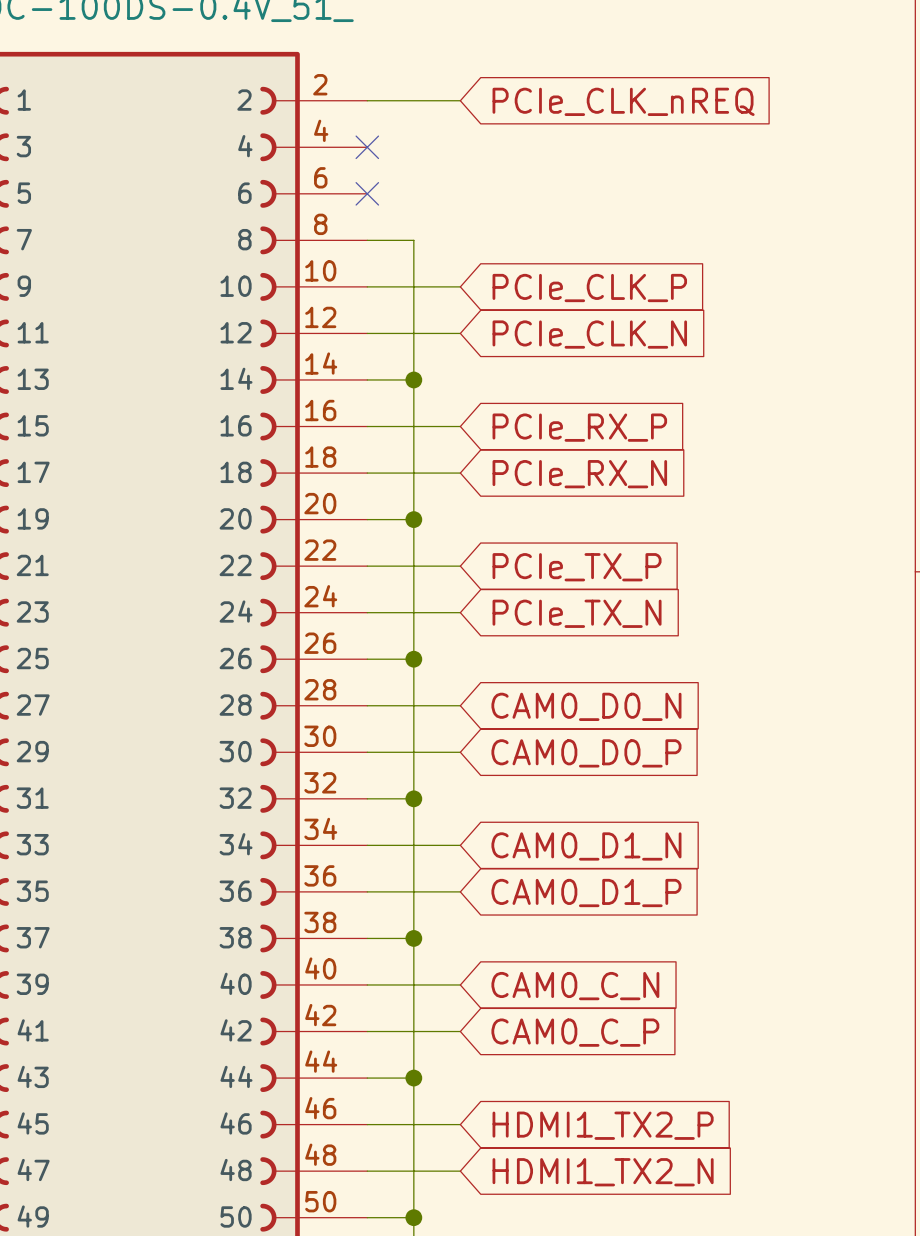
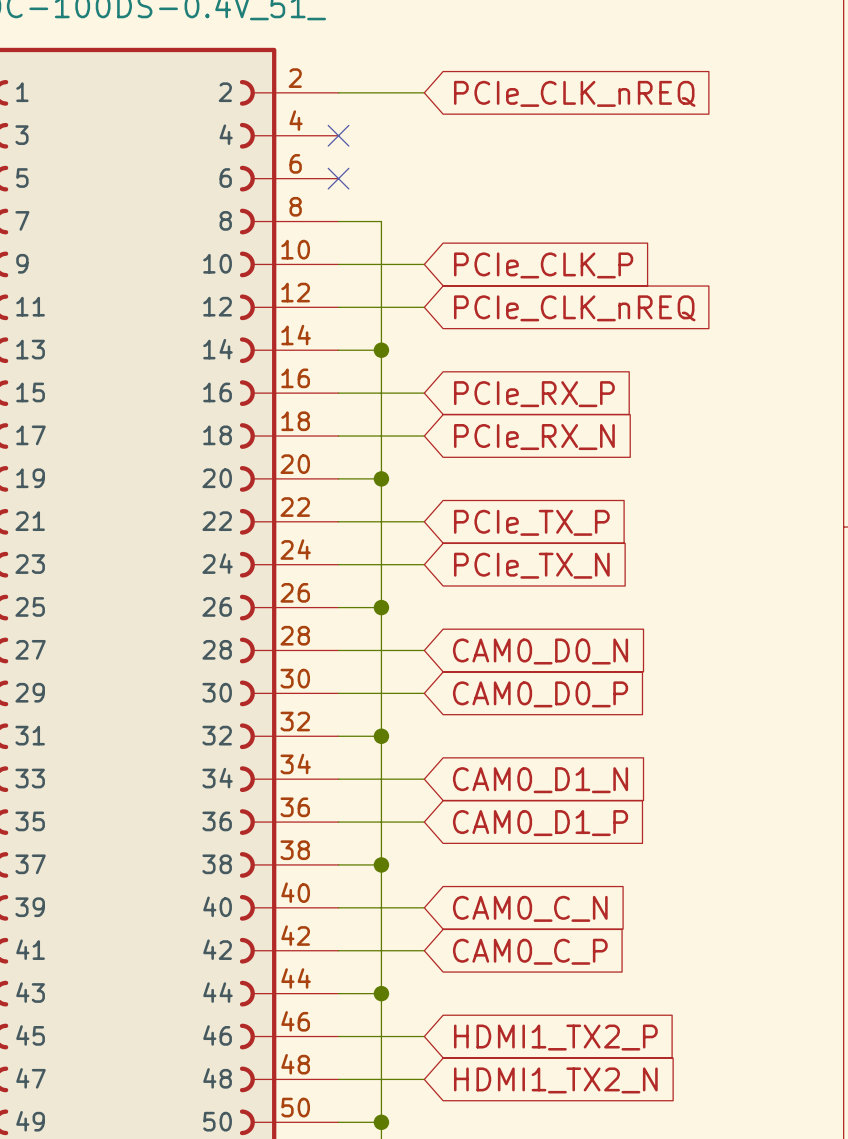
global label: PCIe_CLK_N (589, 334) -> PCIe_CLK_nREQ (574, 308)

